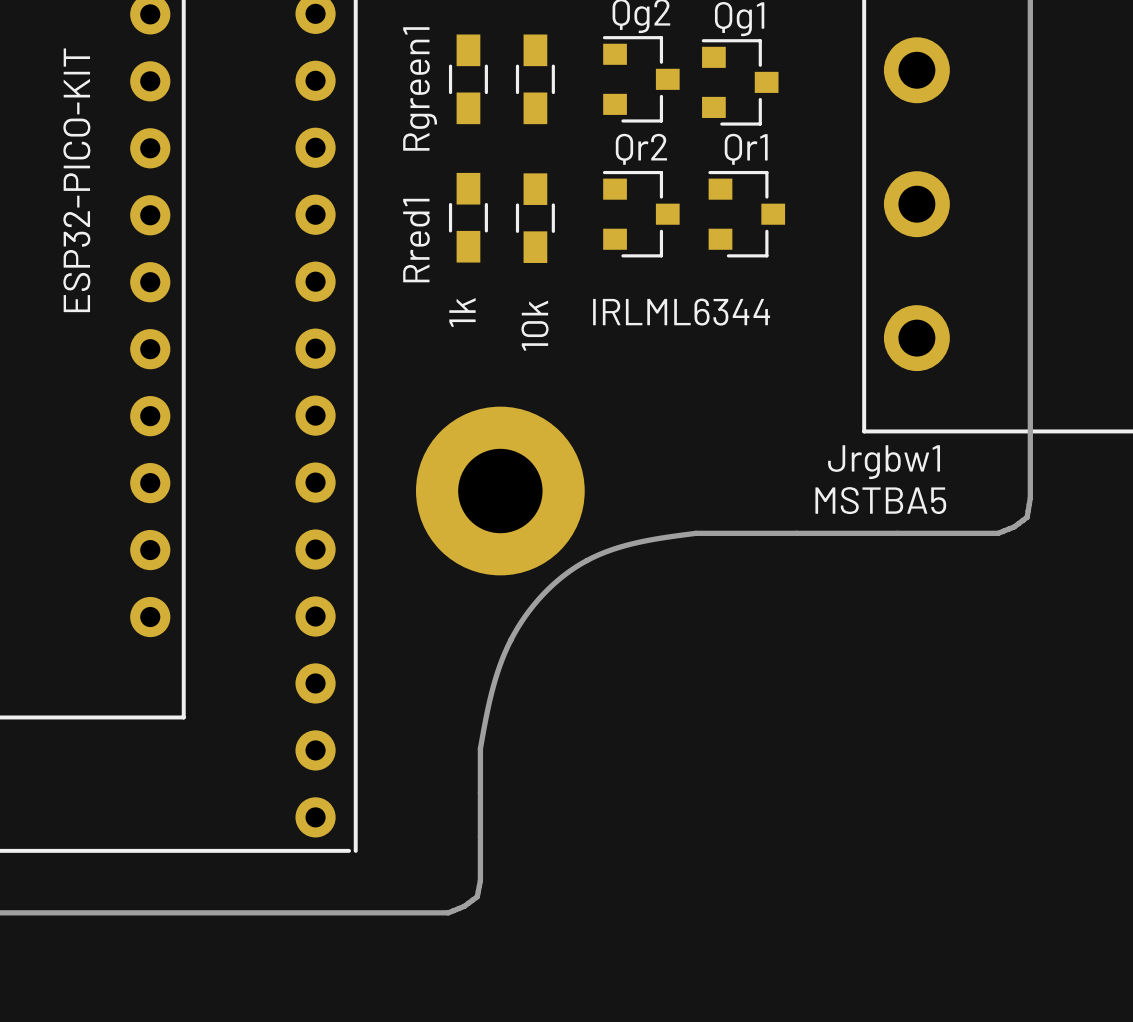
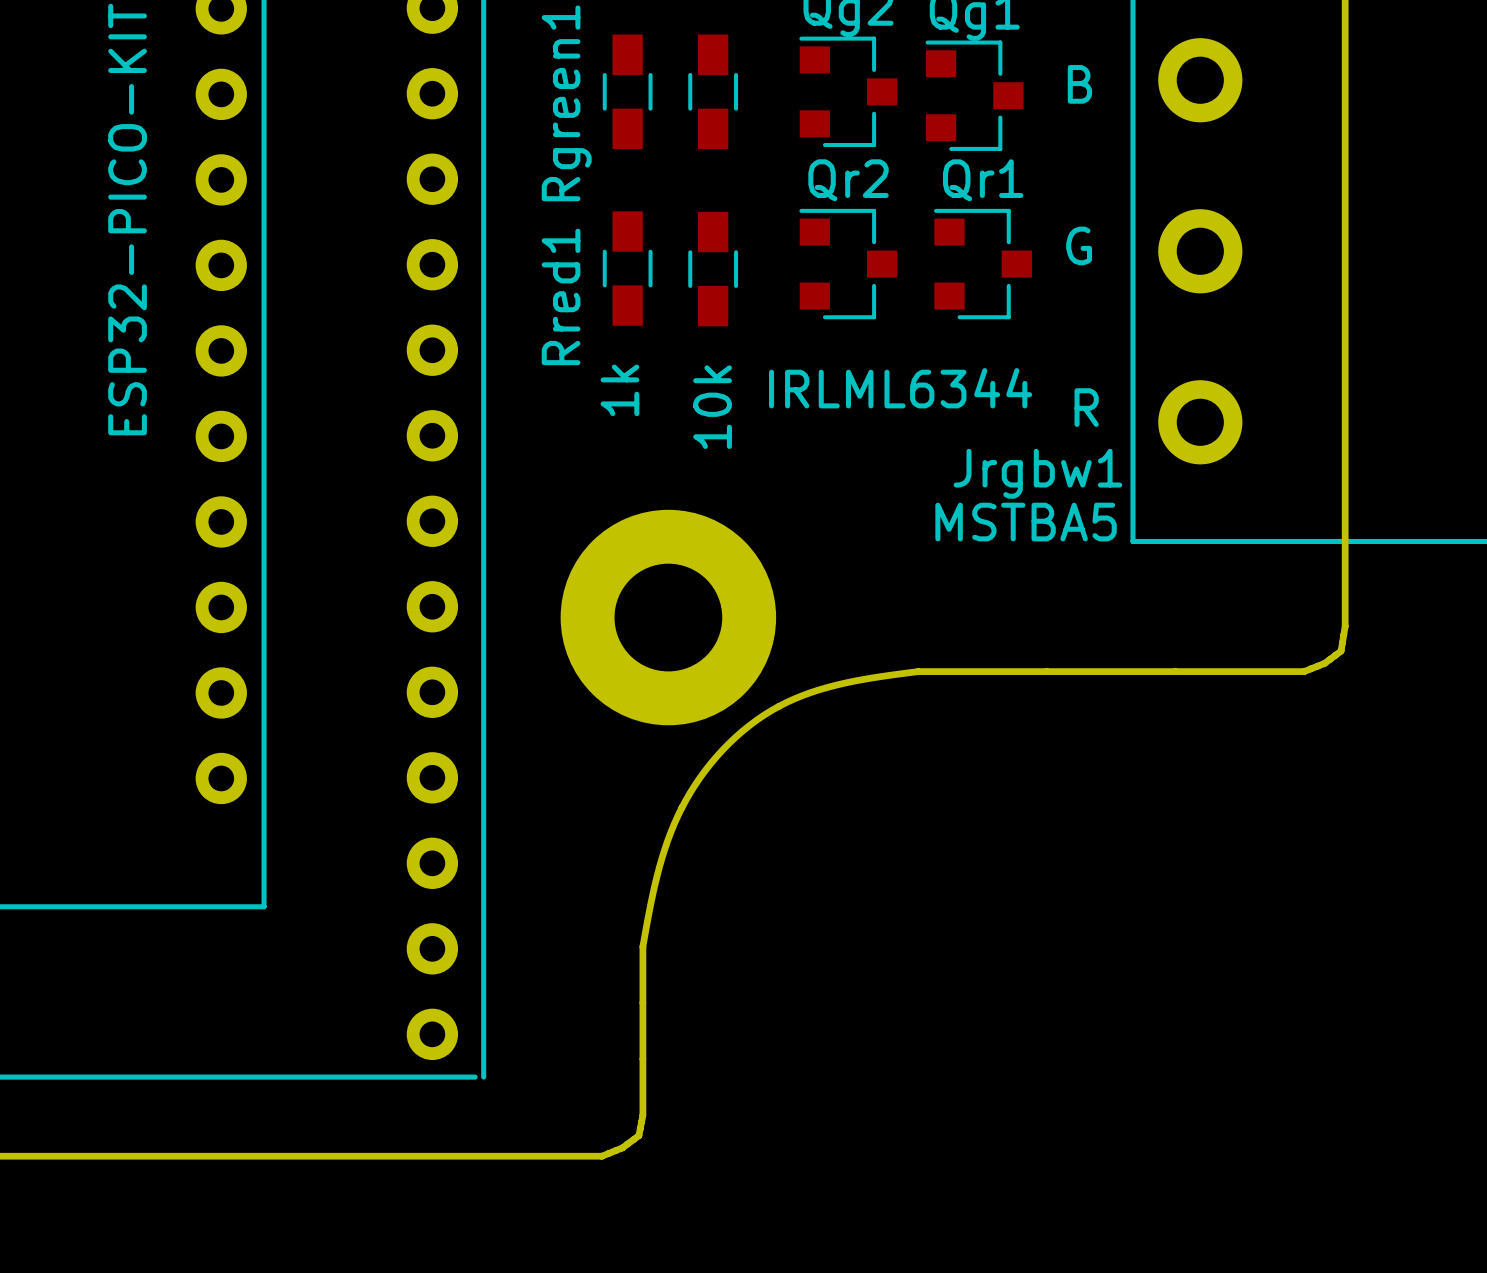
Jrgbw1 text: none -> B (1079, 84)
Jrgbw1 text: none -> G (1079, 245)
Jrgbw1 text: none -> R (1086, 407)
Jrgbw1 name position: Jrgbw1 (884, 462) -> Jrgbw1 (1037, 473)
Jrgbw1 value position: MSTBA5 (880, 500) -> MSTBA5 (1026, 522)

